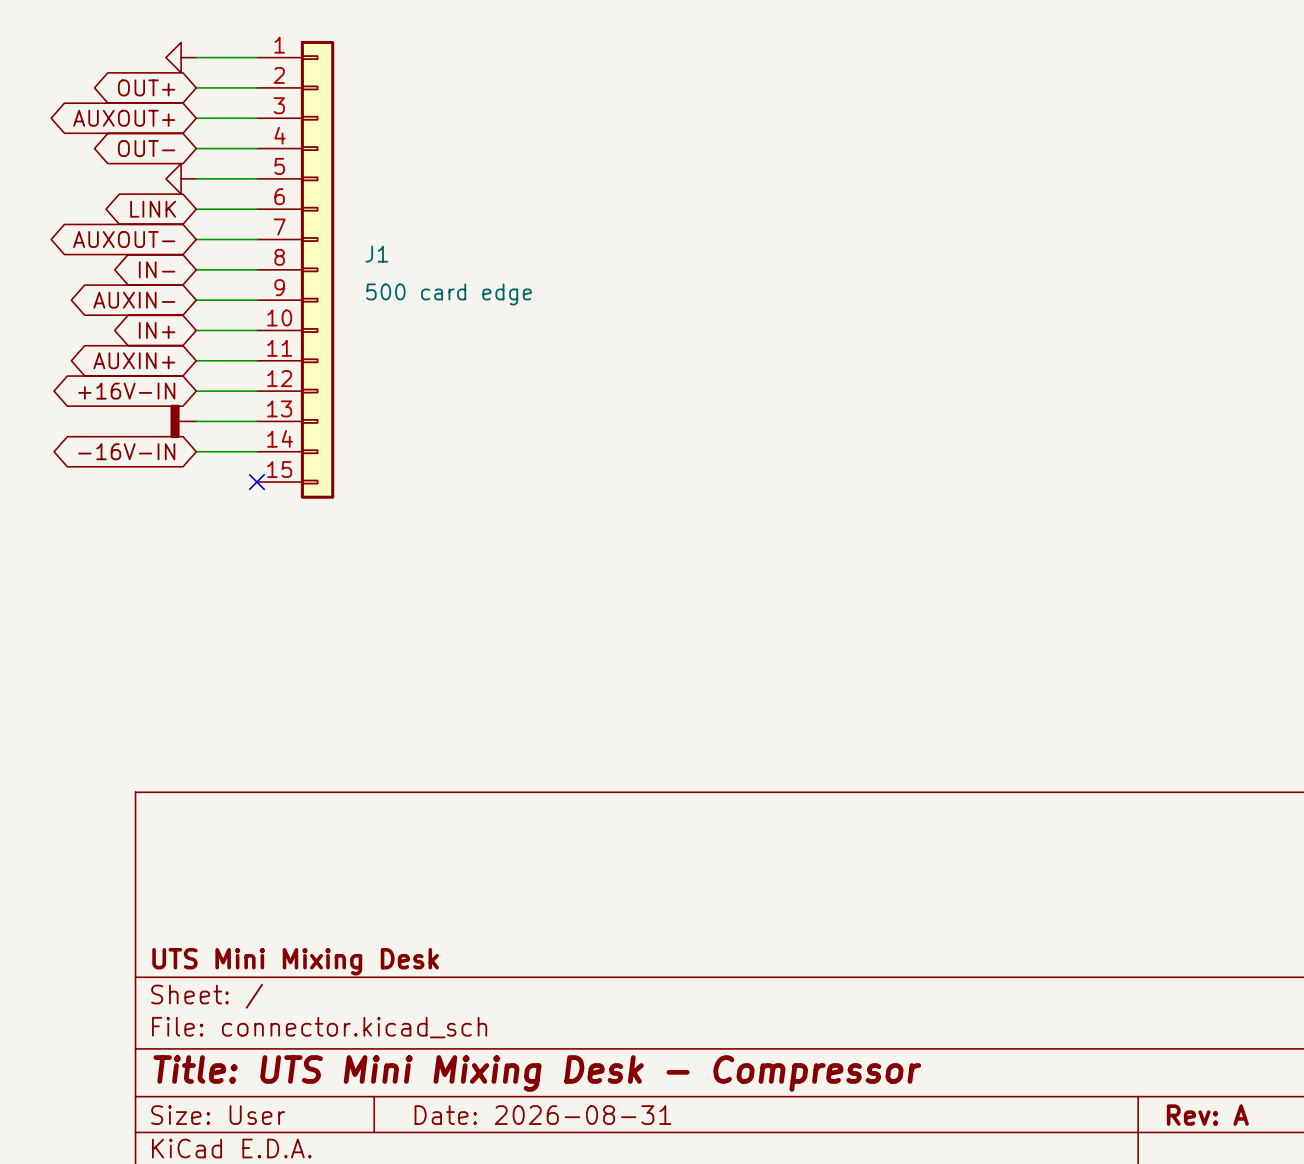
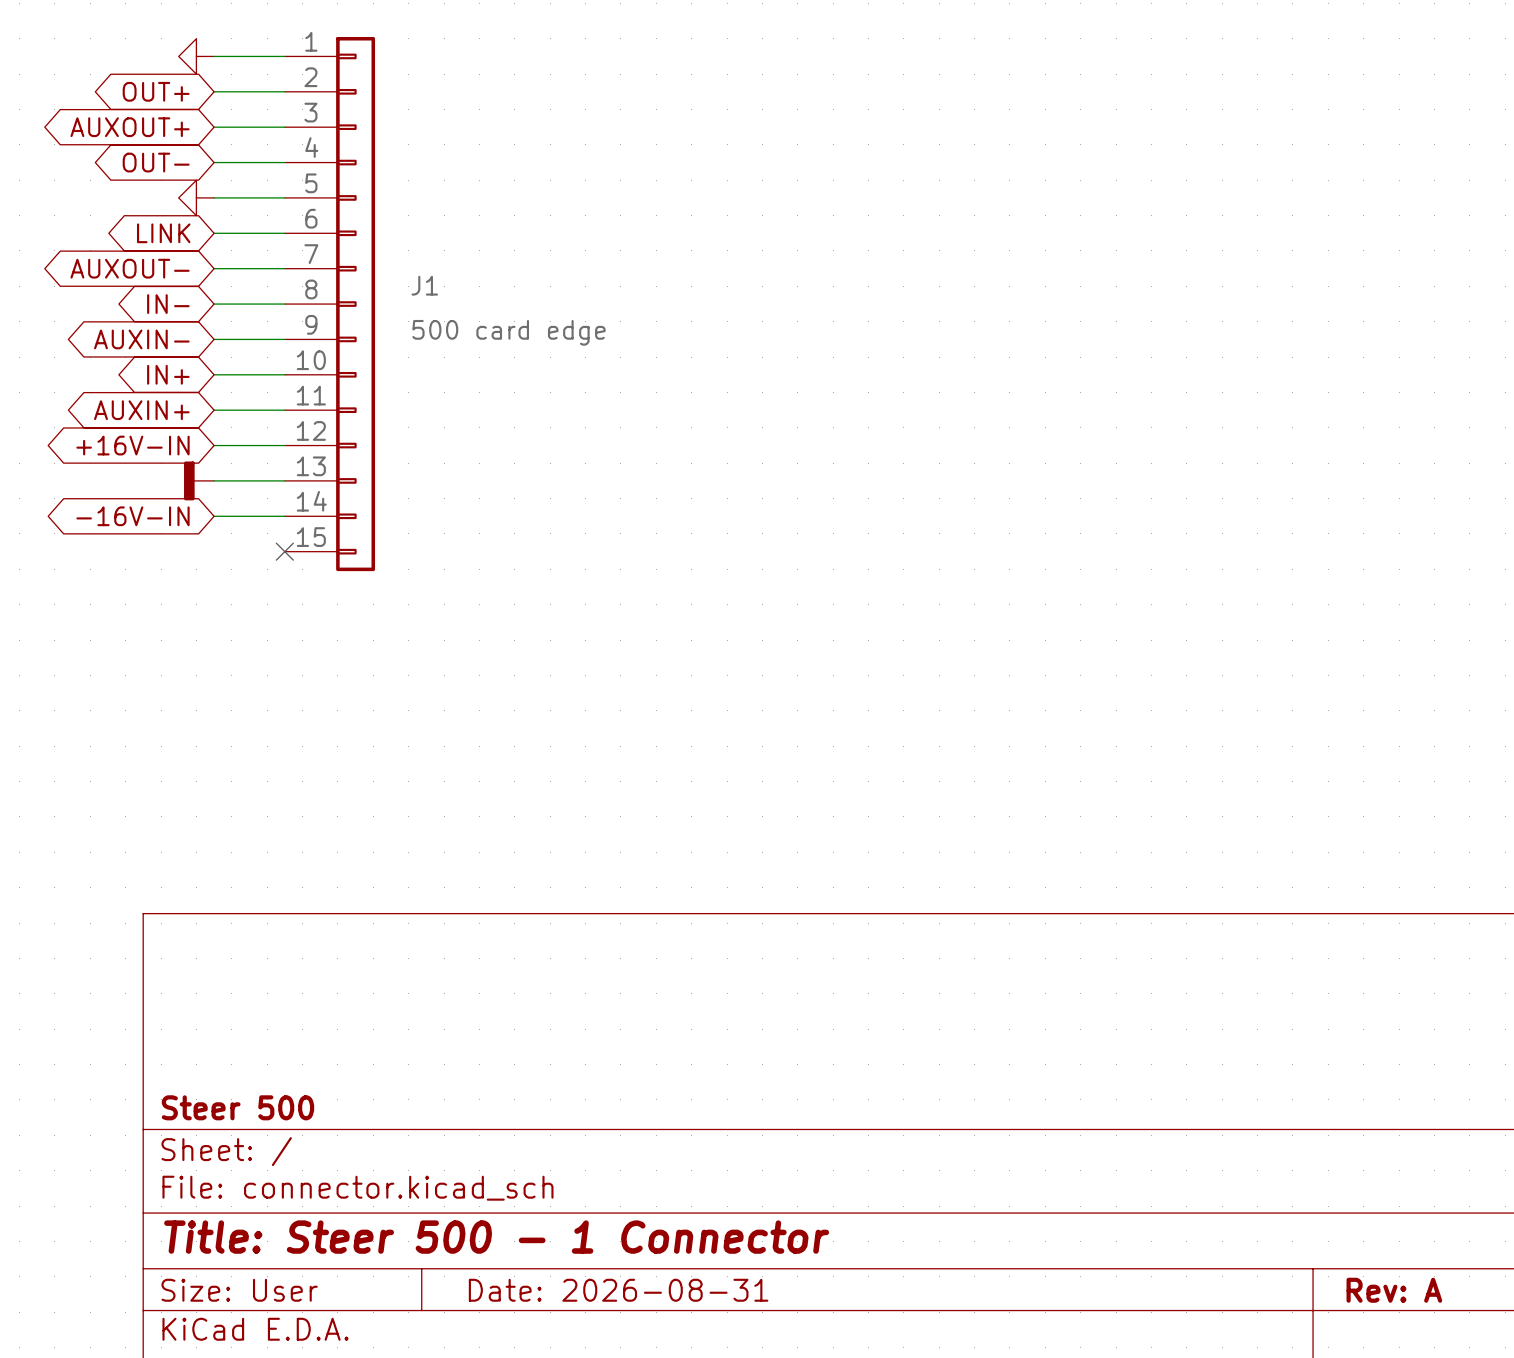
title block: UTS Mini Mixing Desk (295, 961) -> Steer 500 (237, 1107)
title block: Title: UTS Mini Mixing Desk - Compressor (537, 1073) -> Title: Steer 500 - 1 Connector (496, 1237)

